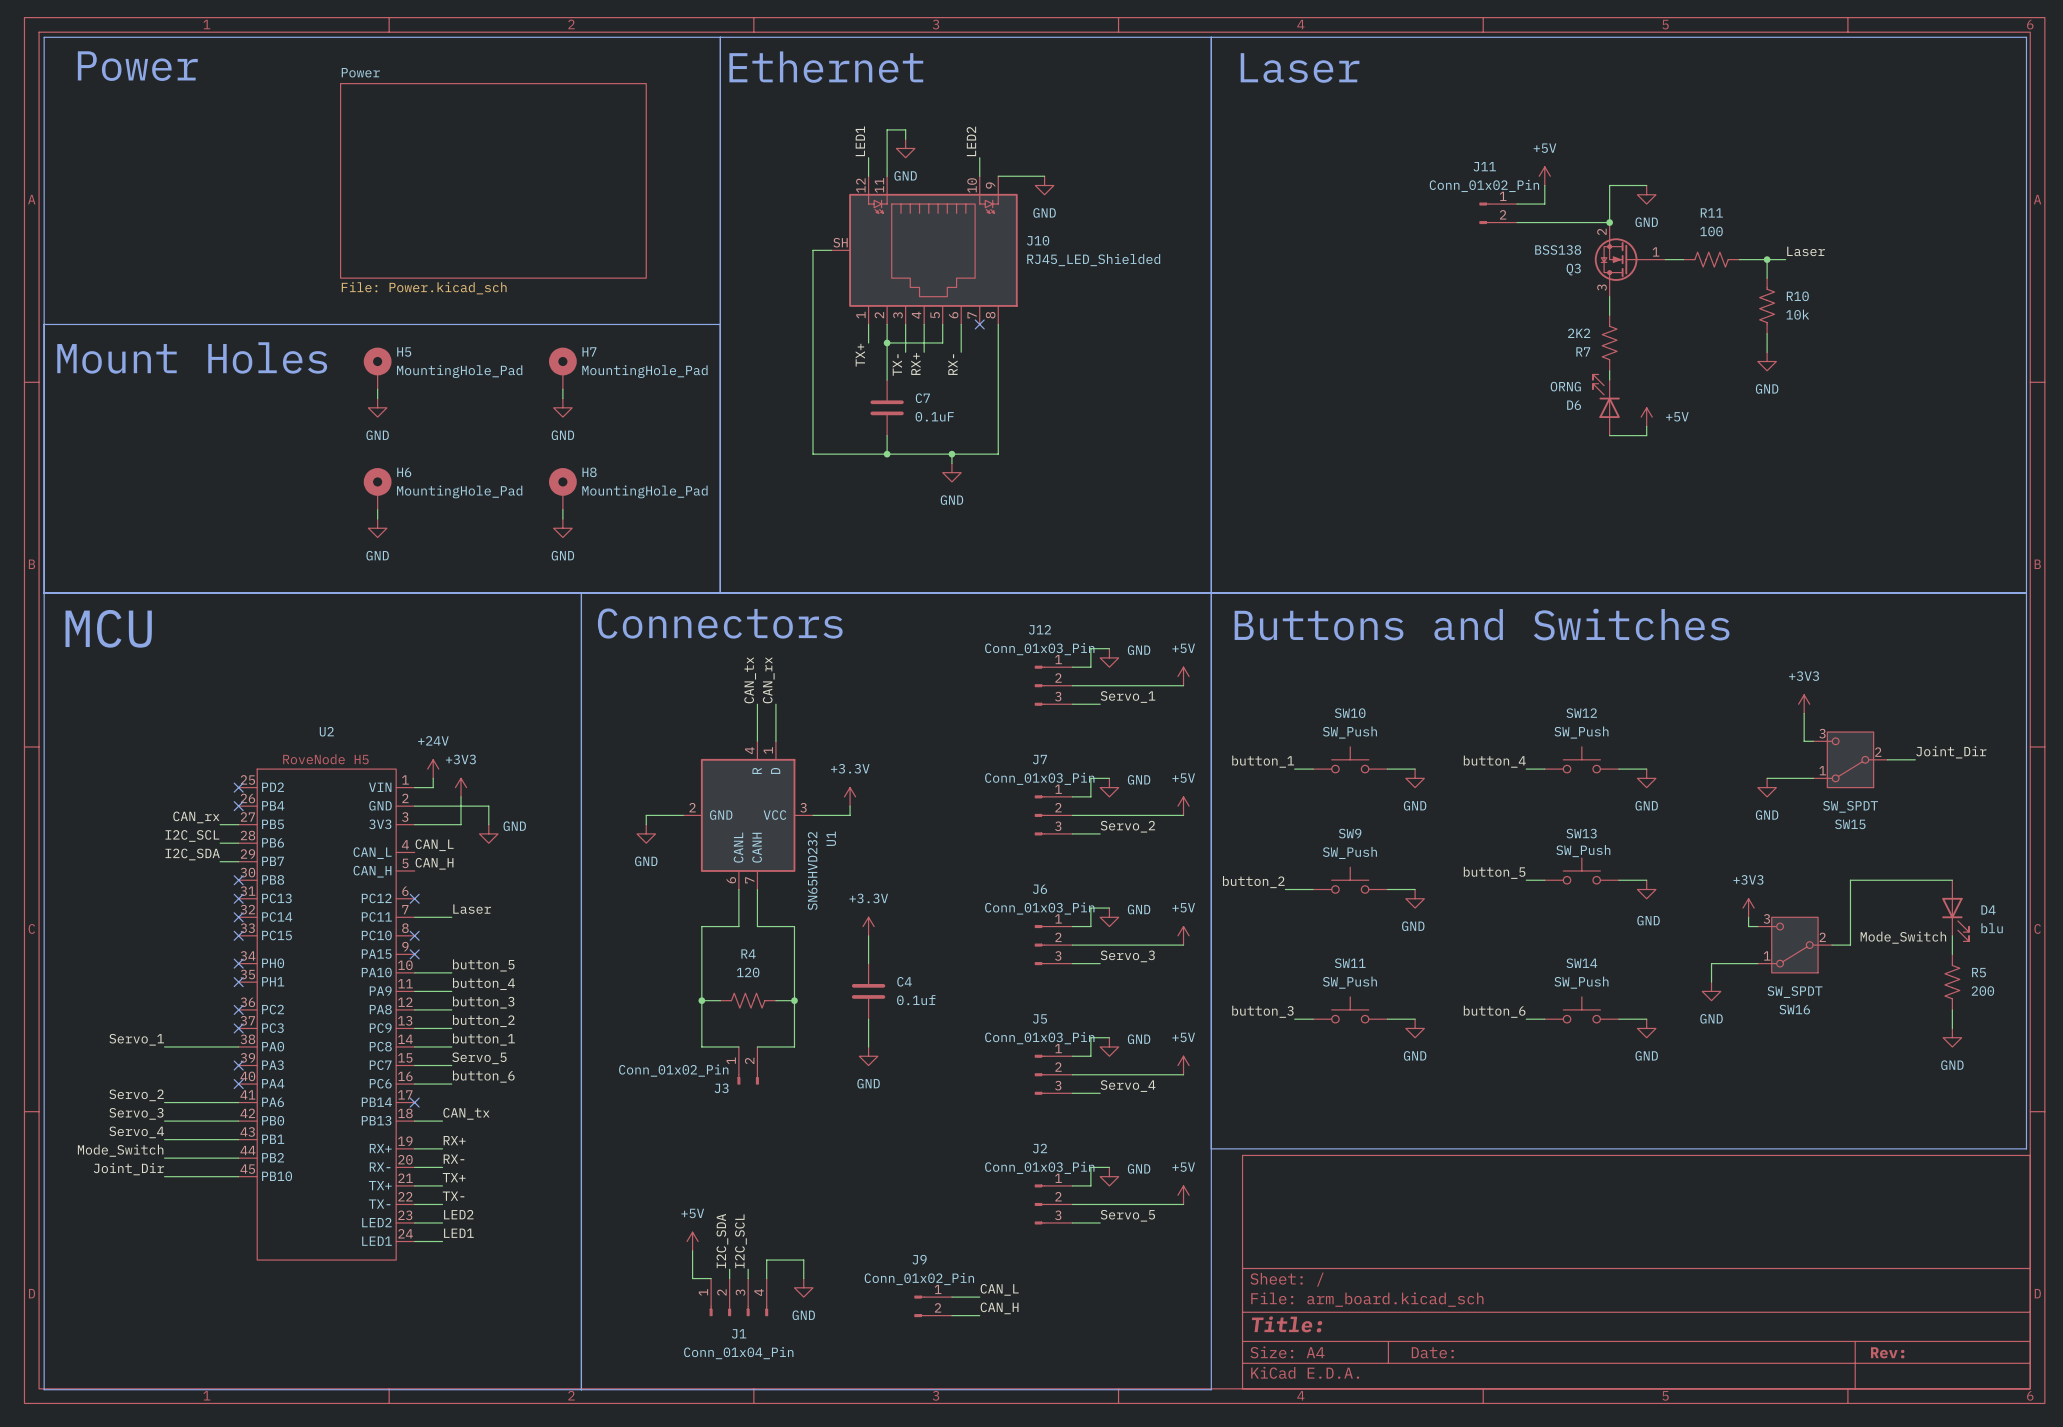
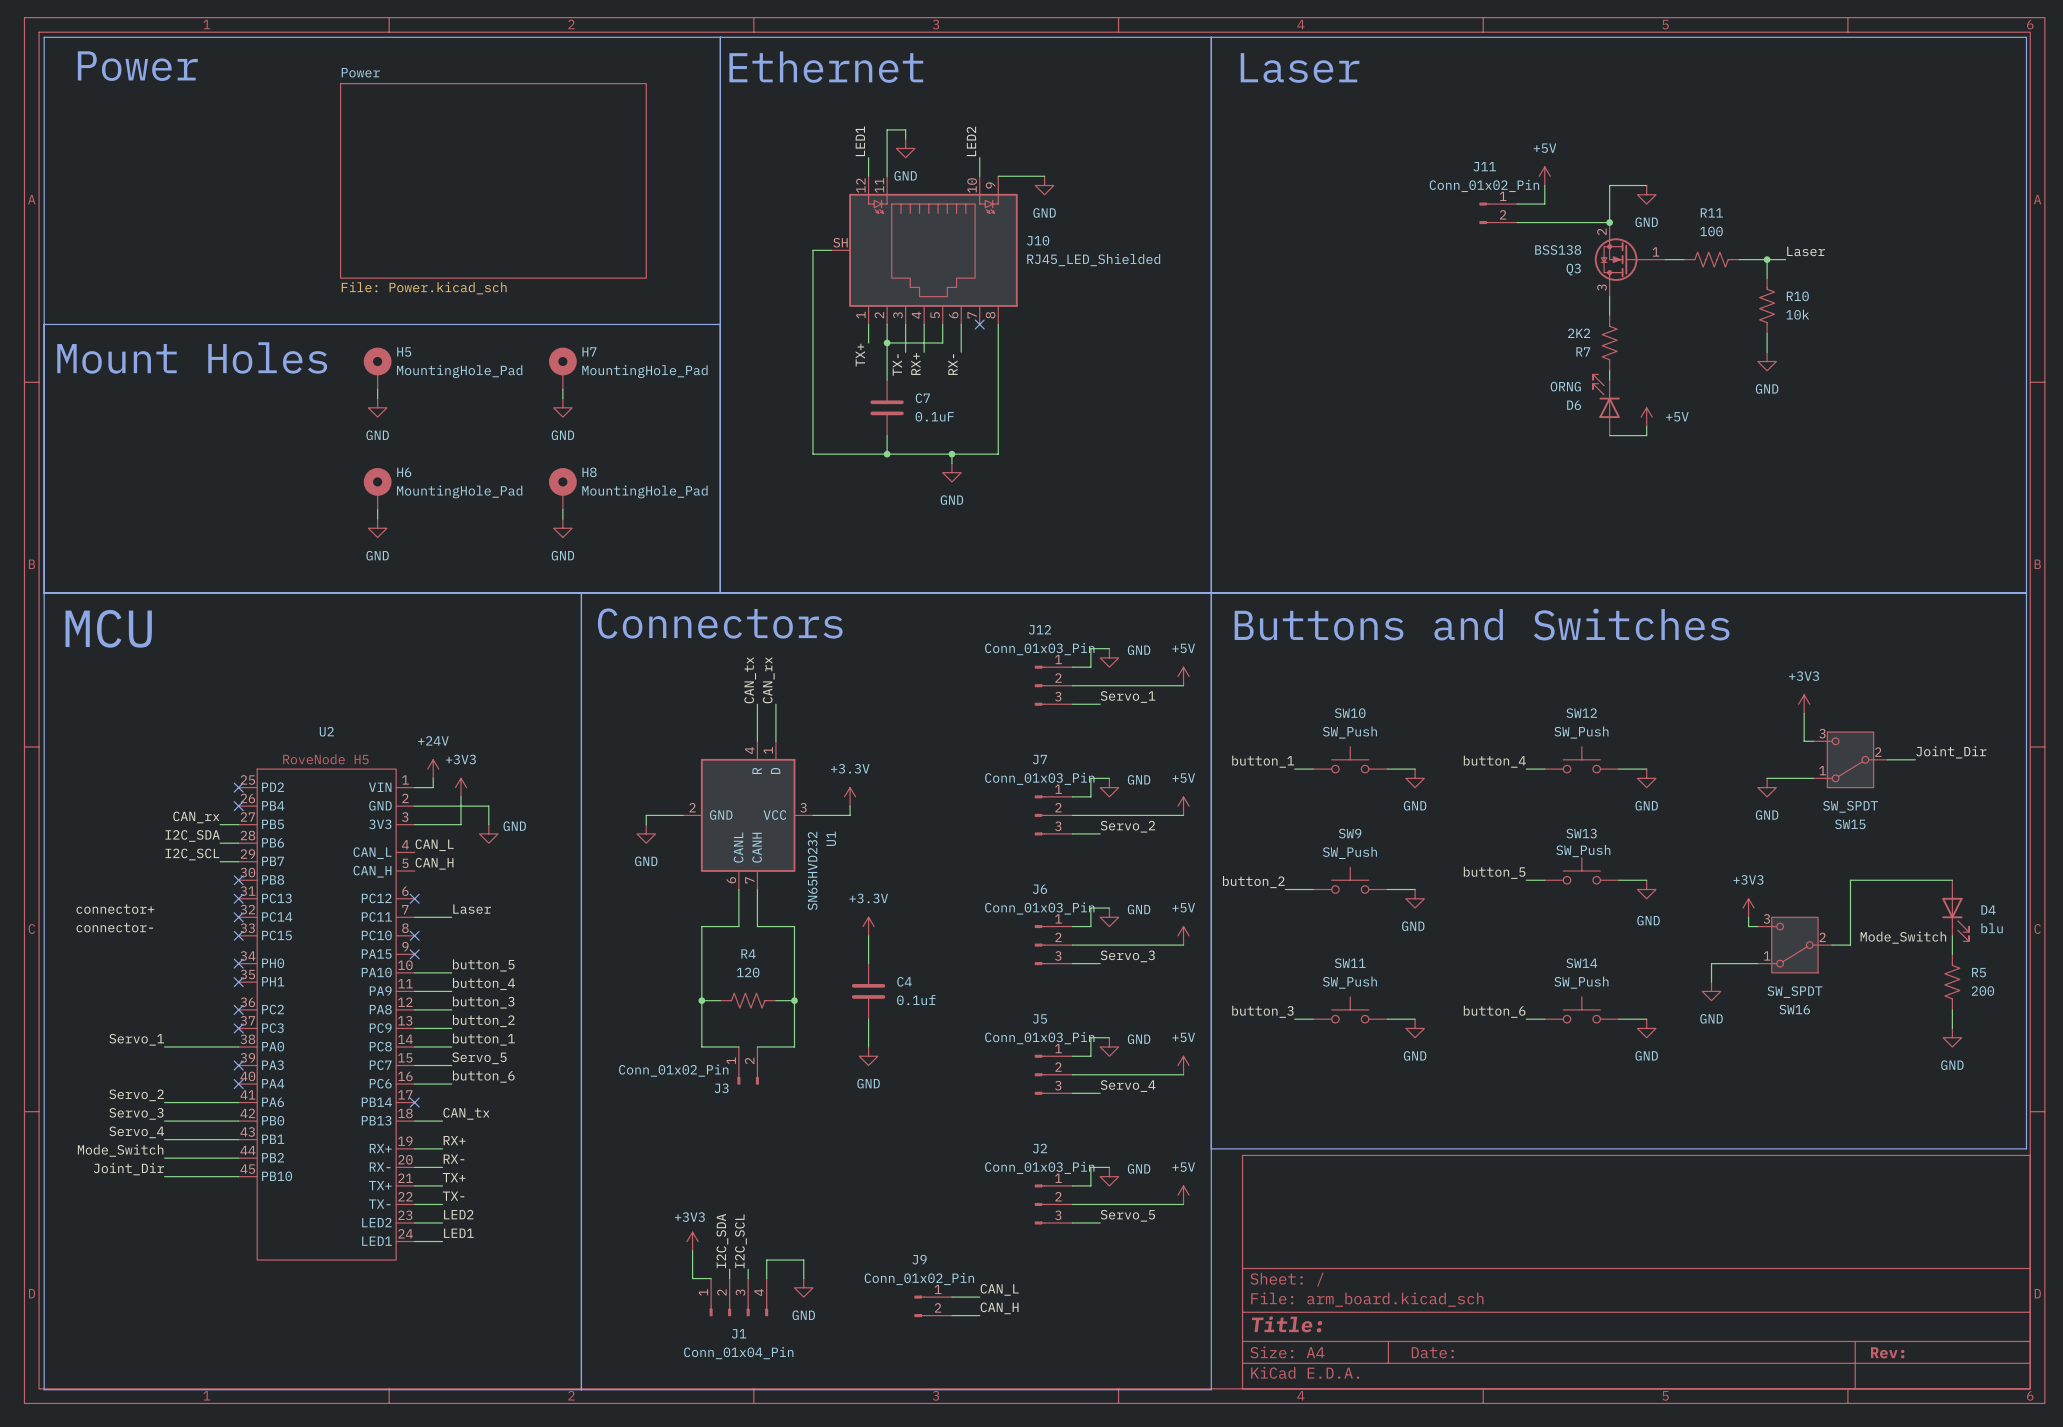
label: I2C_SCL (192, 835) -> I2C_SDA (192, 835)
label: I2C_SDA (192, 854) -> I2C_SCL (192, 854)
label: none -> connector+ (115, 909)
label: none -> connector- (114, 927)
power symbol: +5V (692, 1241) -> +3V3 (692, 1241)

